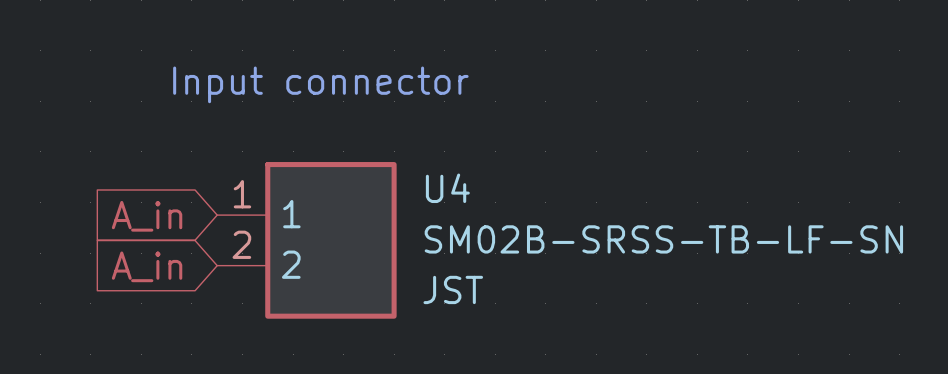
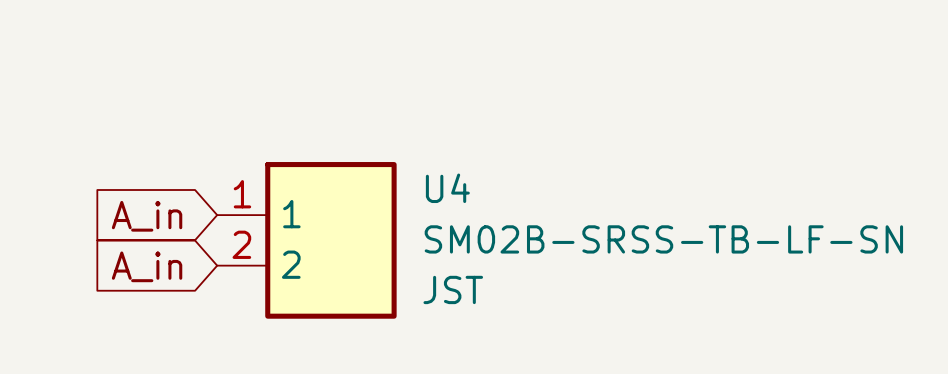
text: Input connector (320, 84) -> none

